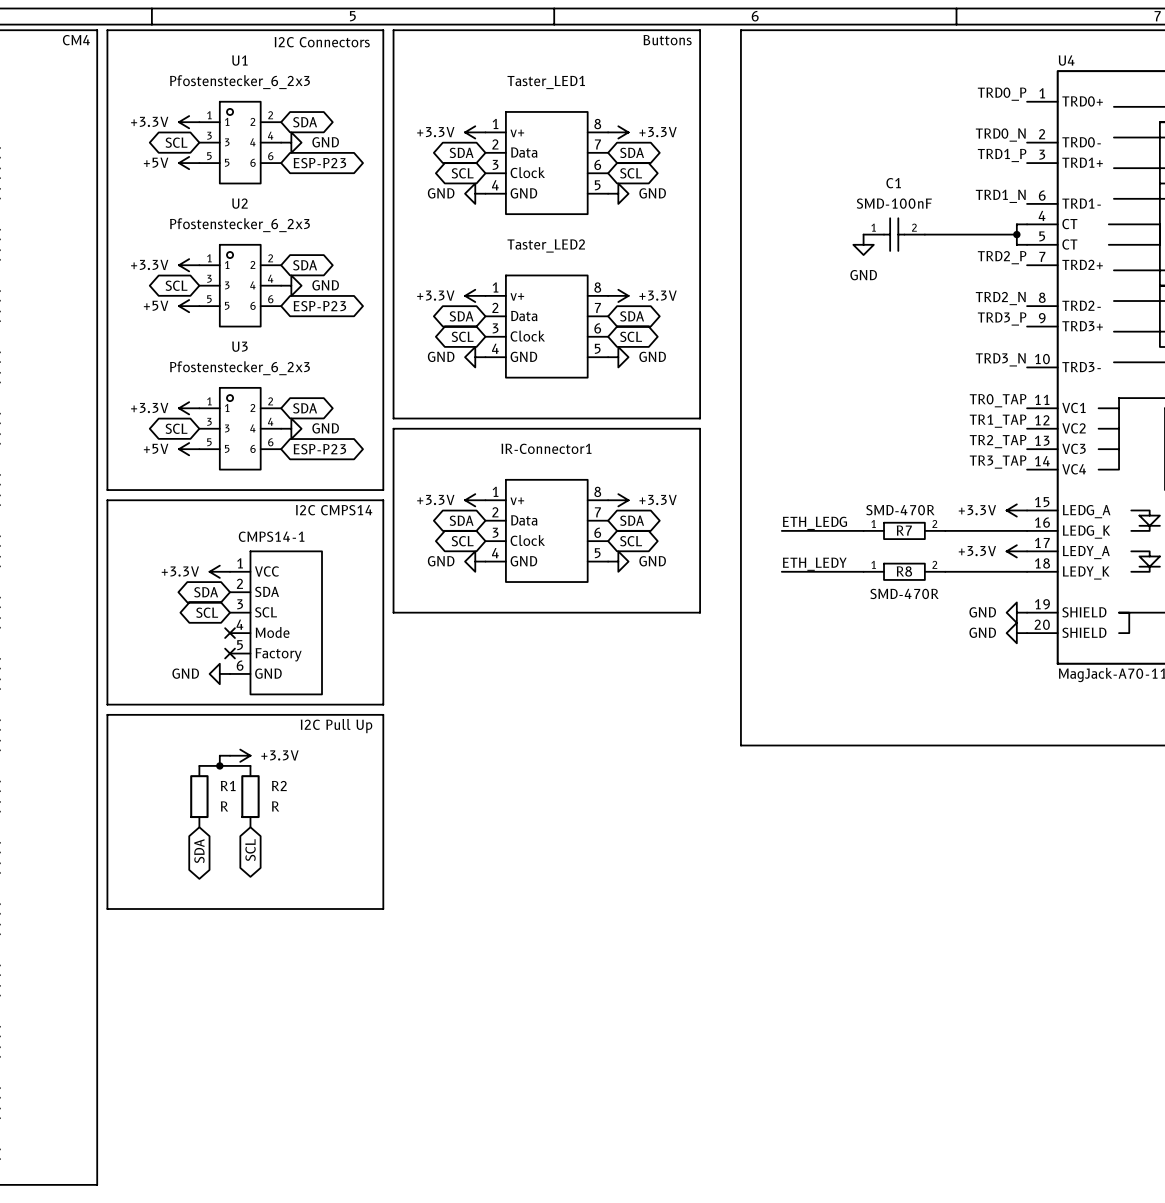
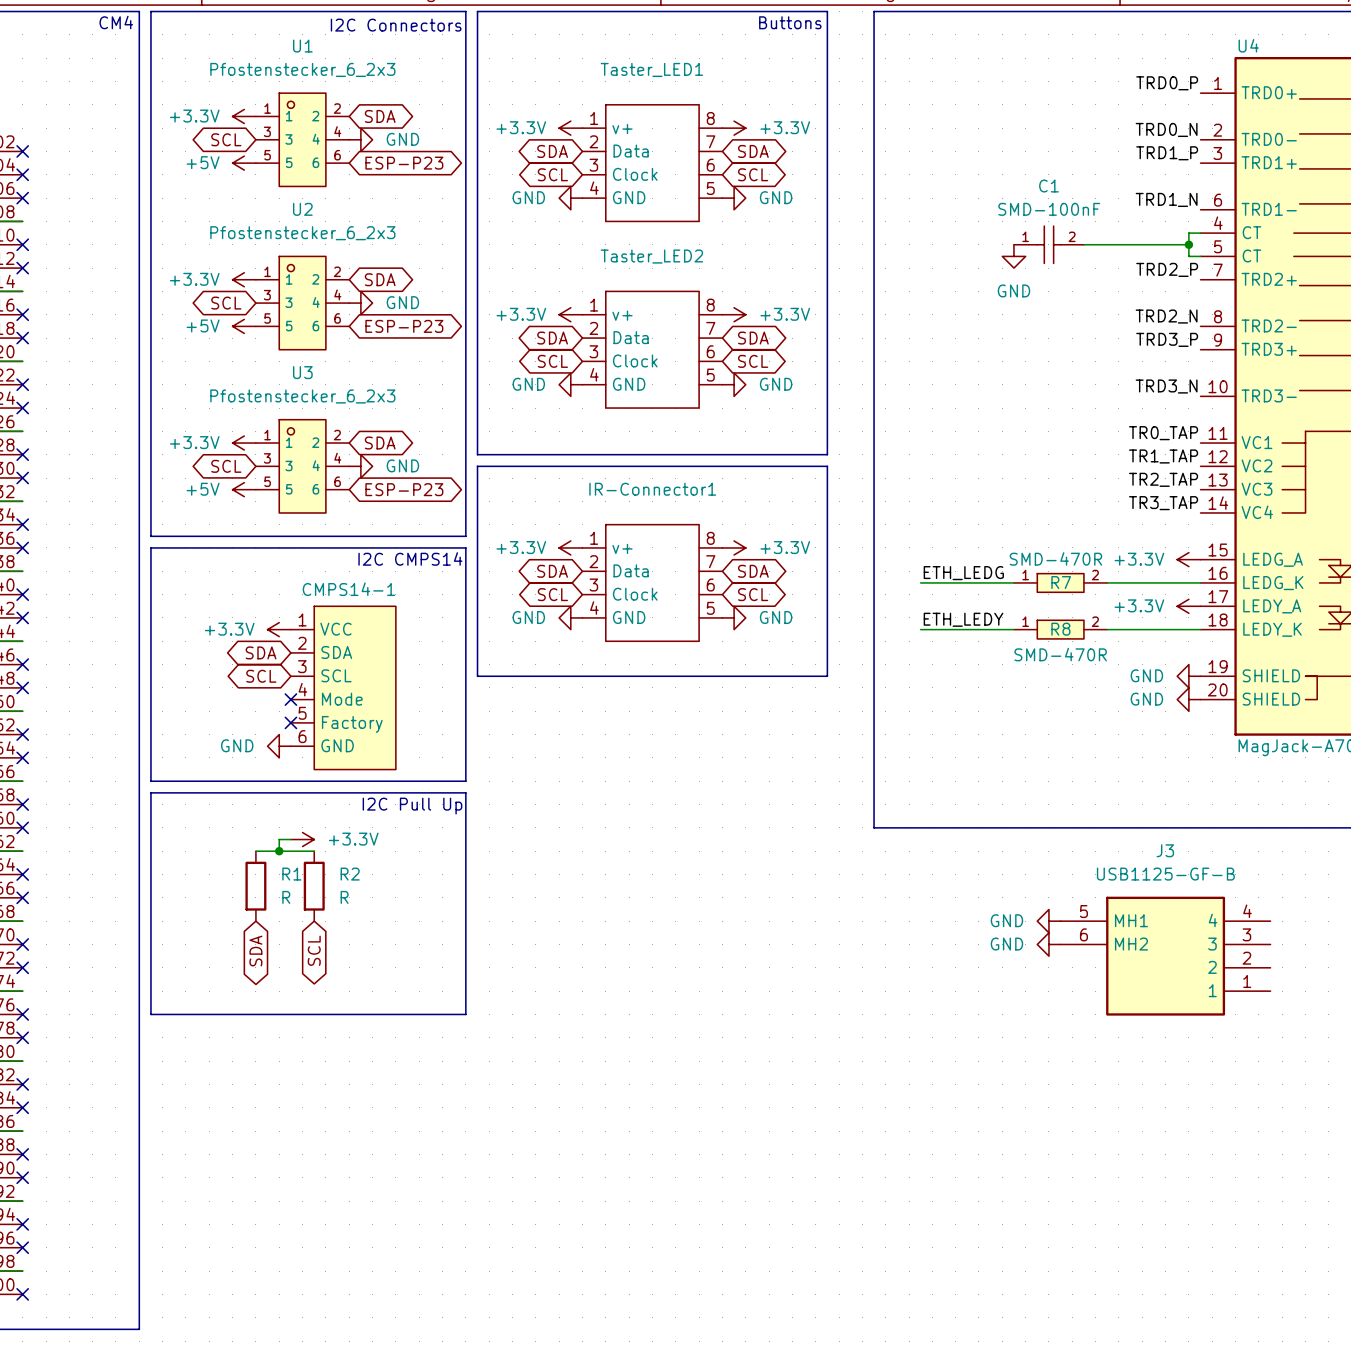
power symbol: none -> GND (1048, 921)
power symbol: none -> GND (1048, 944)
J3: none -> USB1125-GF-B (1165, 956)

